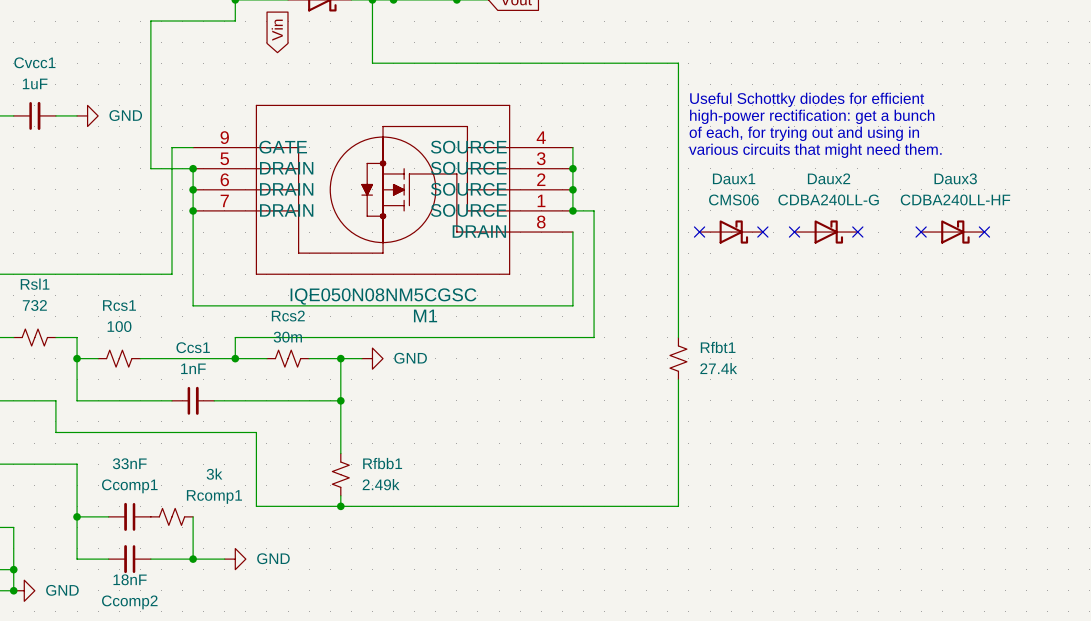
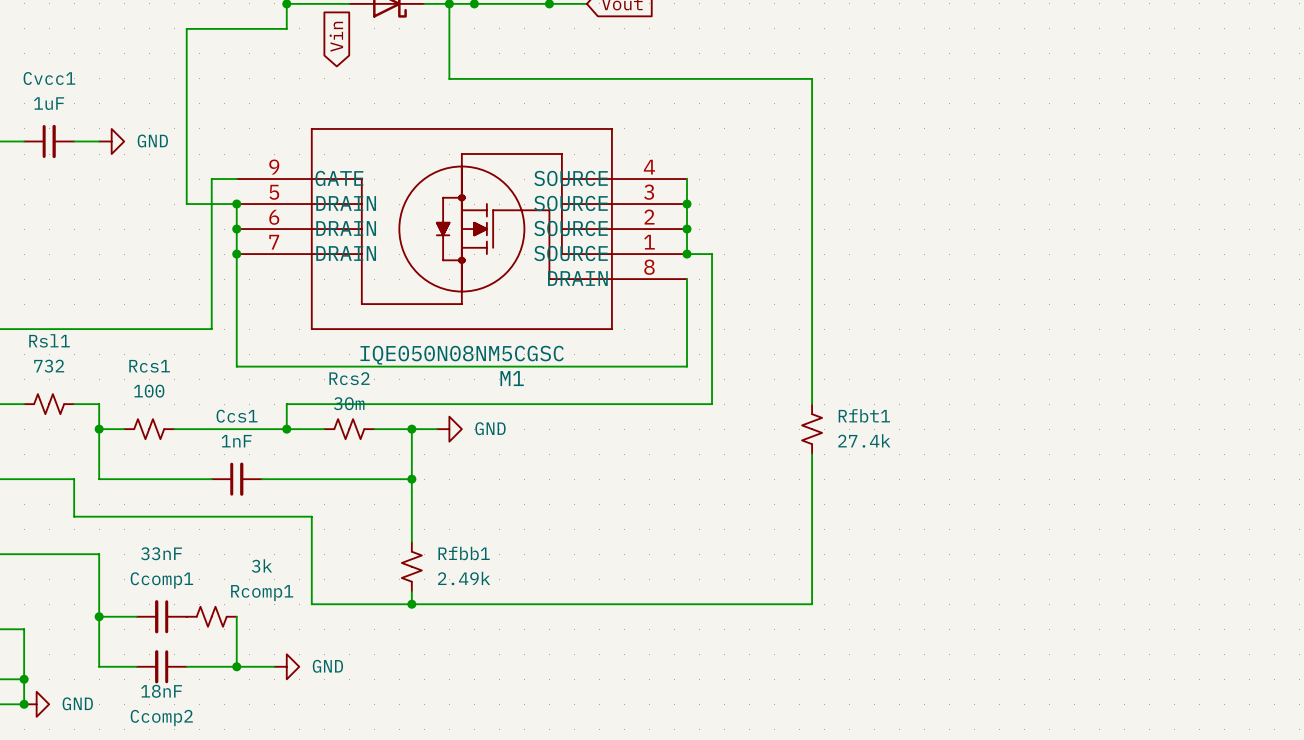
text: Useful Schottky diodes for efficient (807, 99) -> none
text: high-power rectification: get a bunch (812, 116) -> none
text: of each, for trying out and using in (804, 133) -> none
text: various circuits that might need them. (815, 150) -> none
no-connect mark: (699, 232) -> none
Daux1: CMS06 (731, 232) -> none
no-connect mark: (762, 232) -> none
no-connect mark: (794, 232) -> none
Daux2: CDBA240LL-G (826, 232) -> none
no-connect mark: (857, 232) -> none
no-connect mark: (921, 232) -> none
Daux3: CDBA240LL-HF (952, 232) -> none
no-connect mark: (984, 232) -> none

